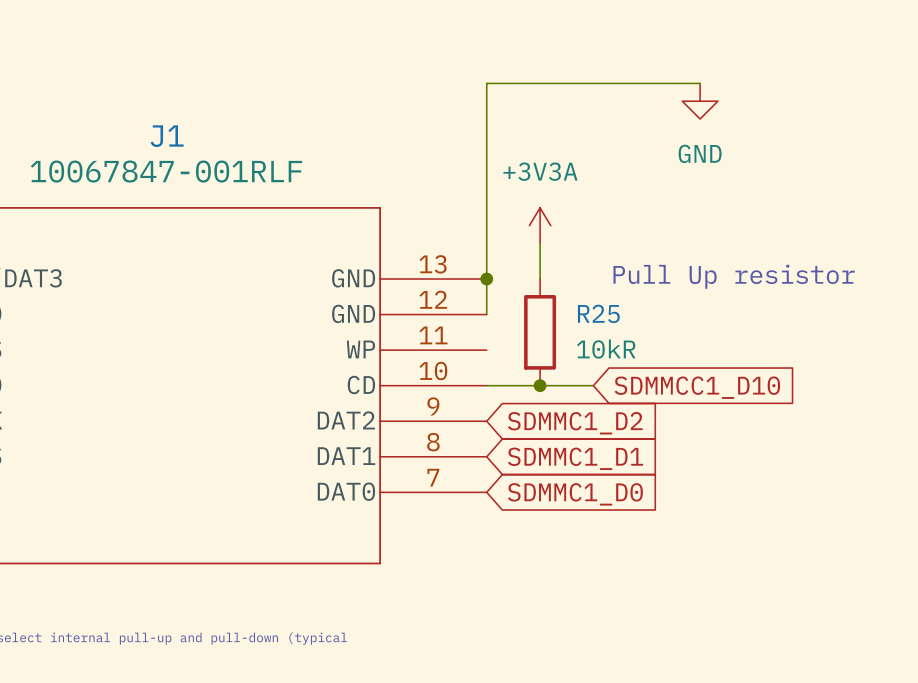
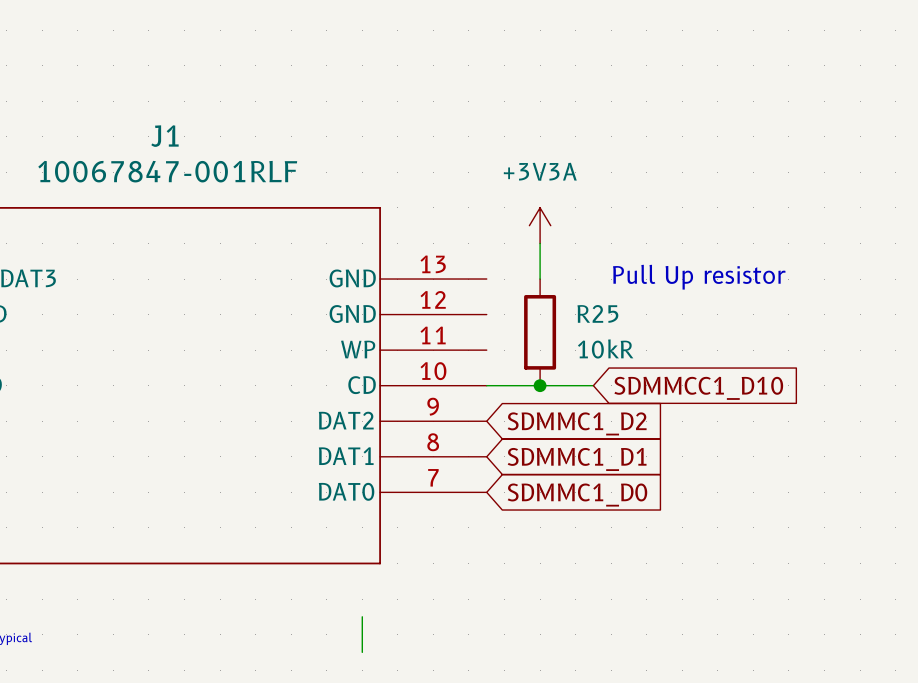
wire: (700, 83) (486, 83) (486, 314) -> none
power symbol: GND (700, 101) -> none
junction: (486, 279) -> none
wire: none -> (362, 616) (362, 652)

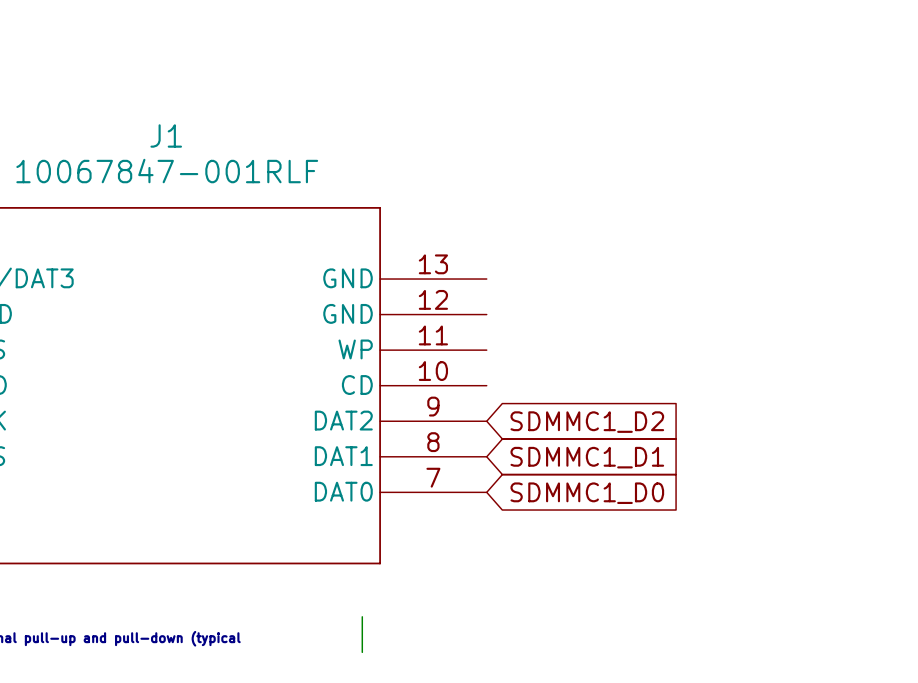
power symbol: +3V3A (540, 225) -> none
wire: (540, 243) (540, 279) -> none
text: Pull Up resistor (699, 277) -> none
R25: 10kR (540, 332) -> none
wire: (486, 385) (593, 385) -> none
junction: (540, 385) -> none
global label: SDMMCC1_D10 (698, 388) -> none

